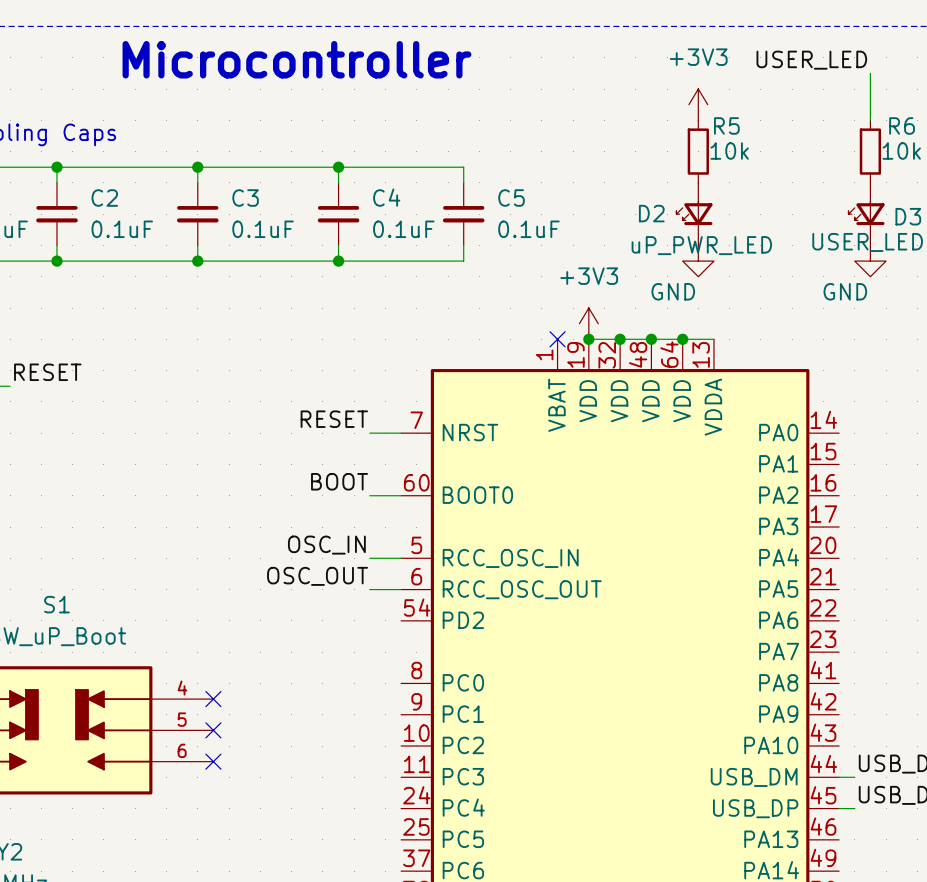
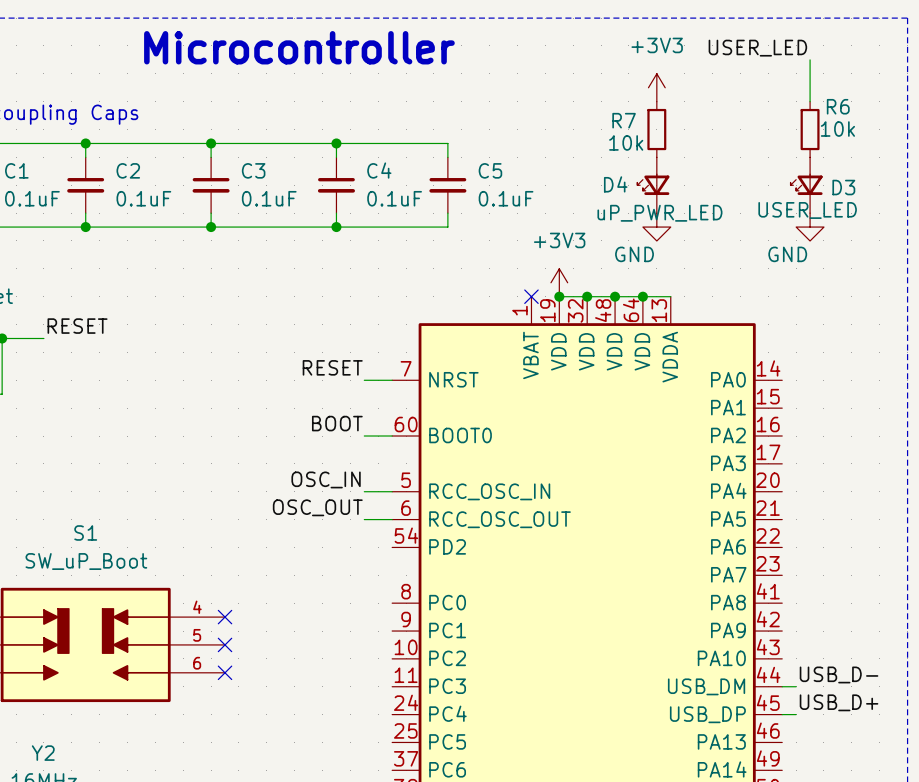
R5 name: R5 (726, 125) -> R7 (624, 120)
R5 value position: 10k (729, 151) -> 10k (626, 142)
D2 name: D2 (651, 213) -> D4 (615, 184)

